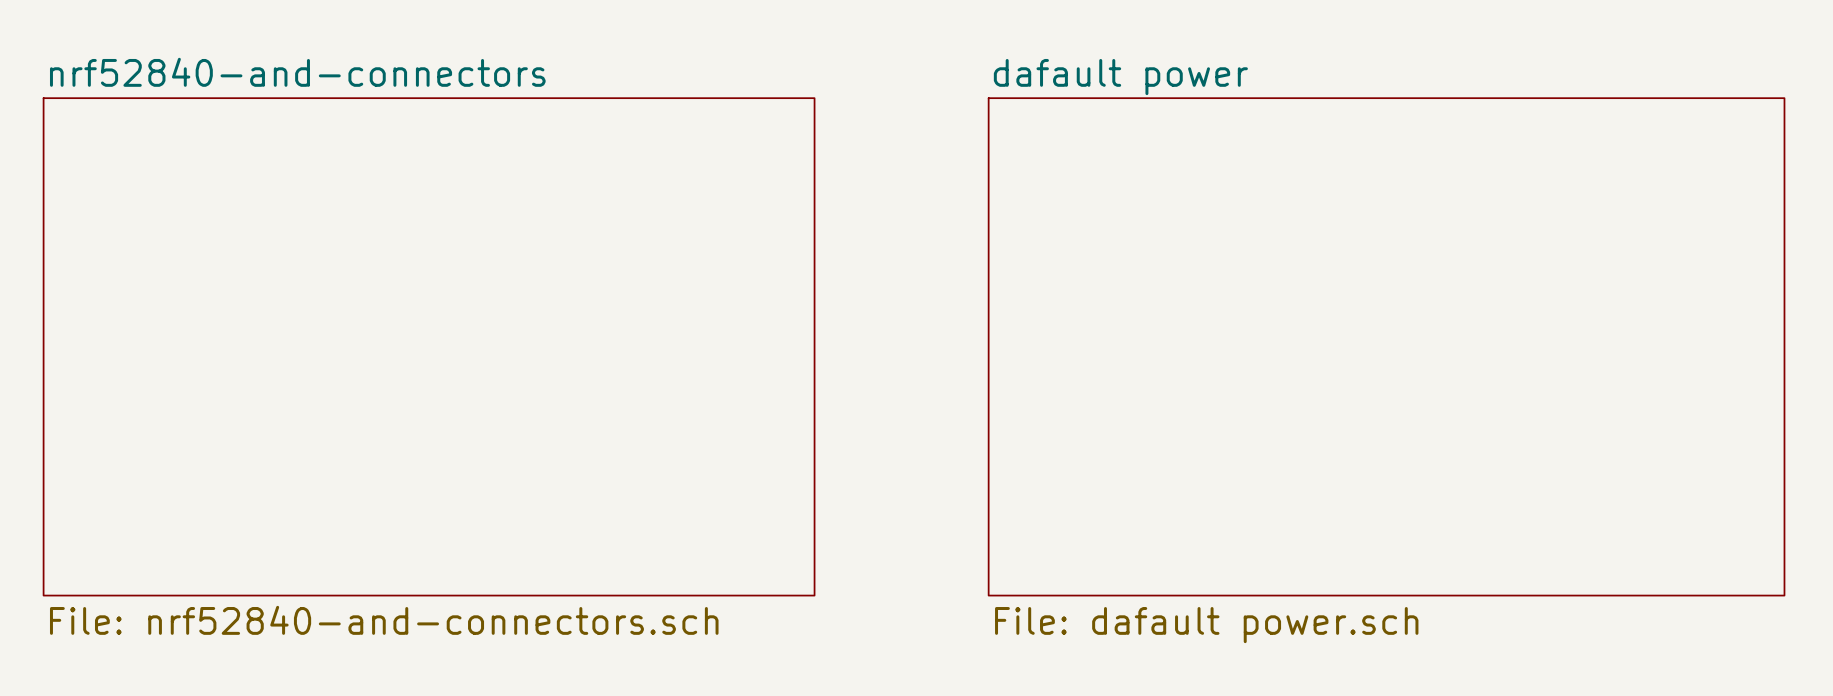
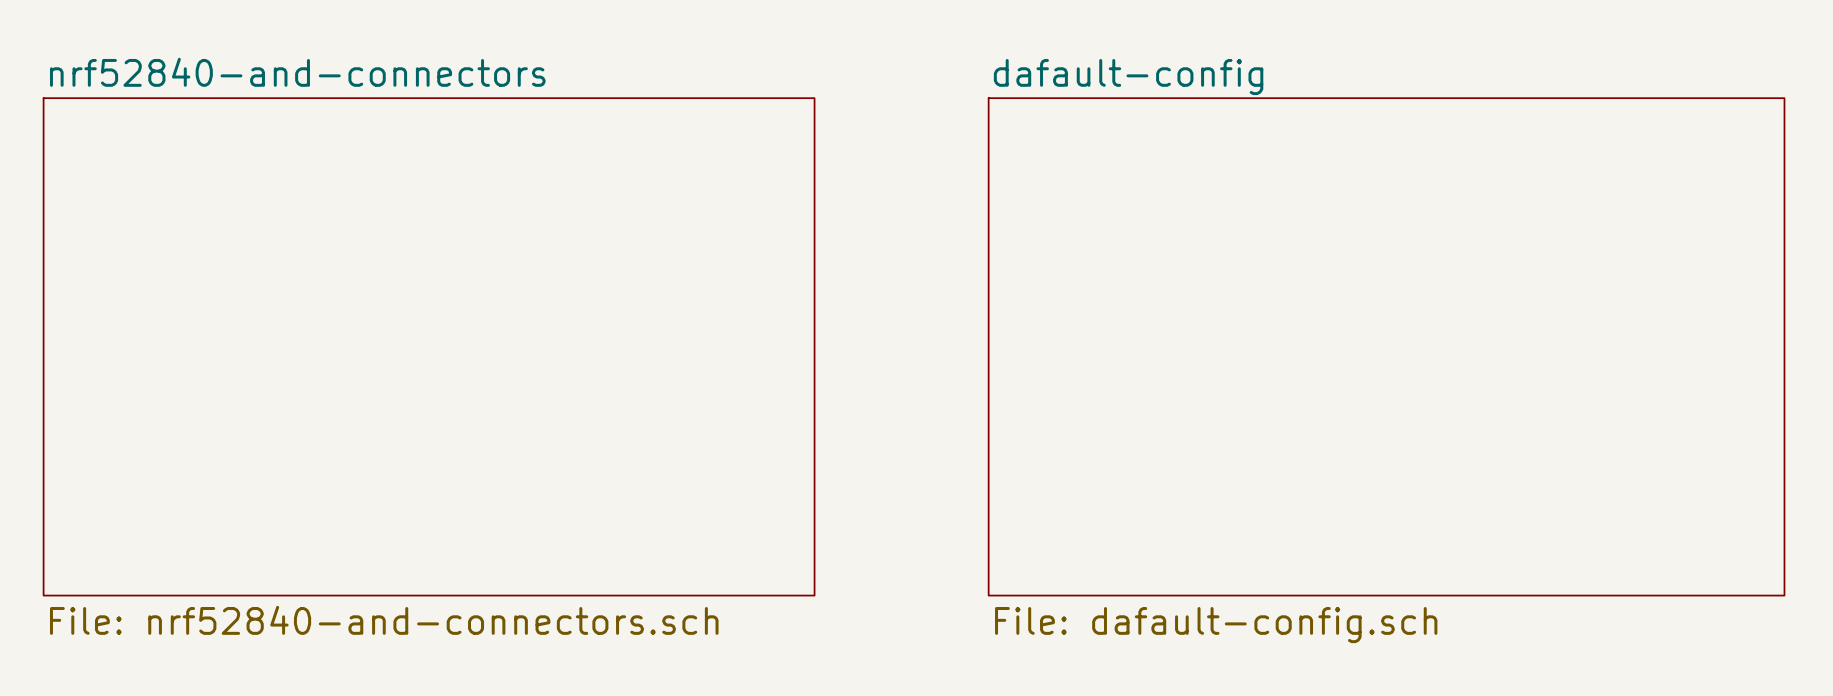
sheet dafault power name: dafault power (1120, 77) -> dafault-config (1128, 77)
sheet dafault power value: File: dafault power.sch (1206, 625) -> File: dafault-config.sch (1216, 625)

